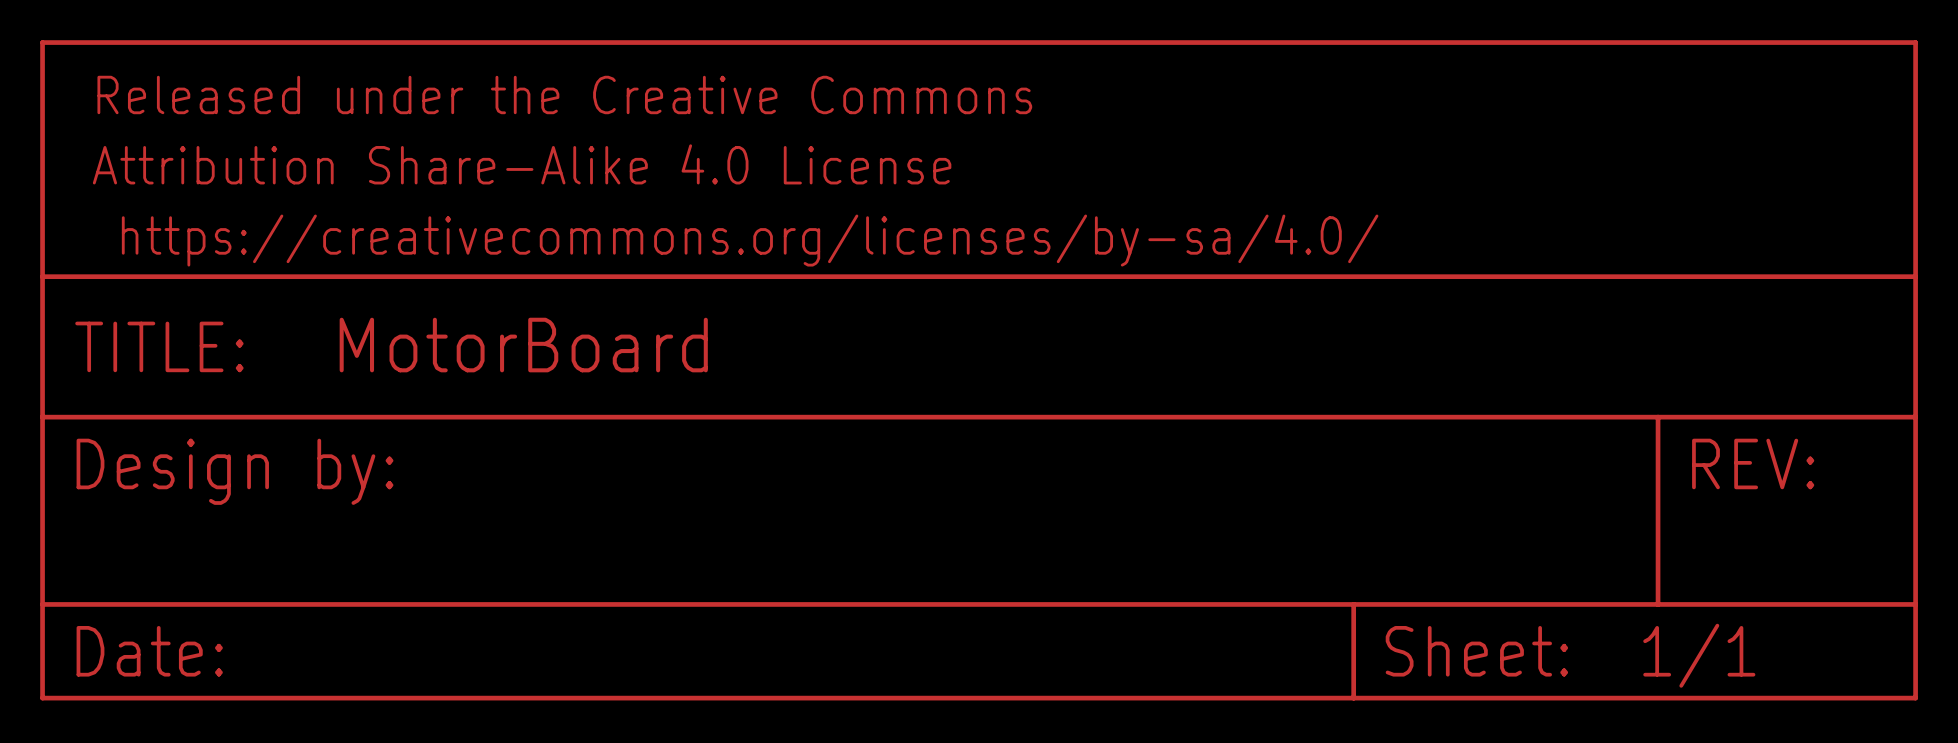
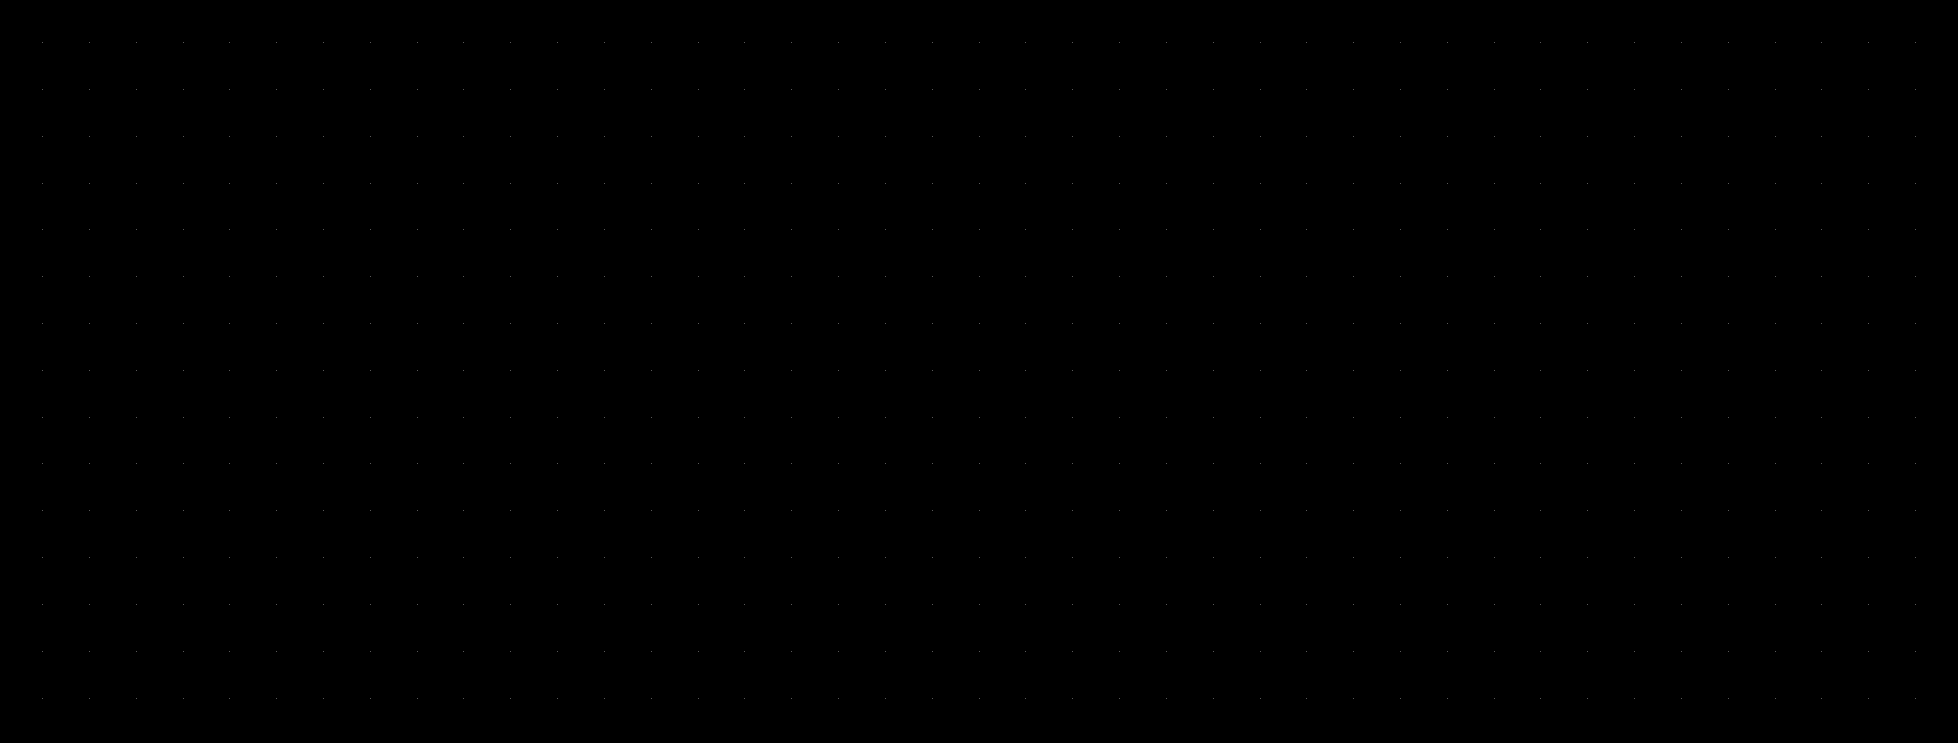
part: (979, 370) -> none

